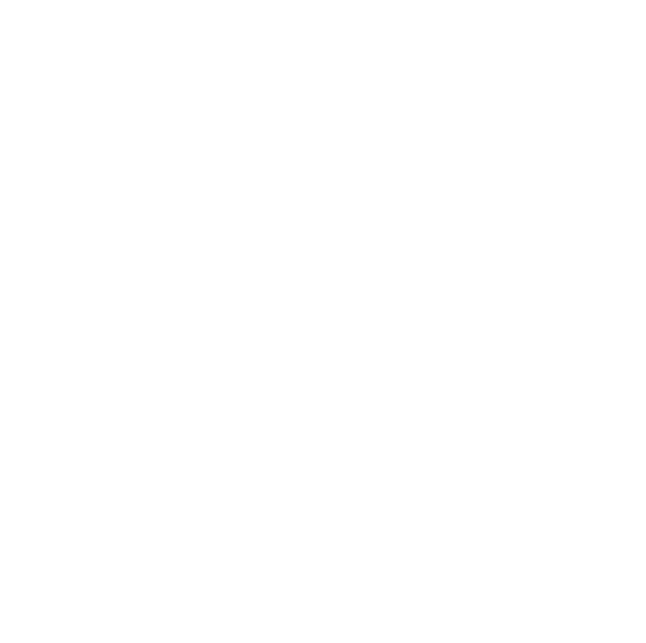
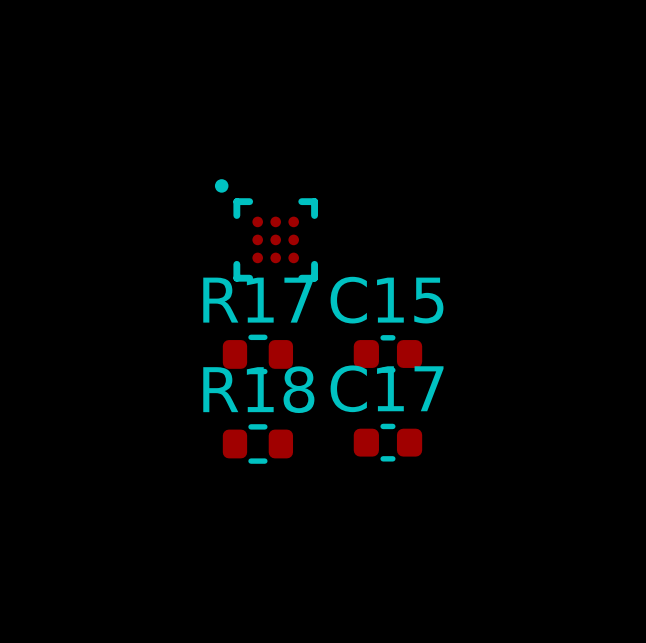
part: none -> (266, 230)
C15: none -> (387, 353)
R17: none -> (257, 354)
C17: none -> (387, 442)
R18: none -> (257, 443)

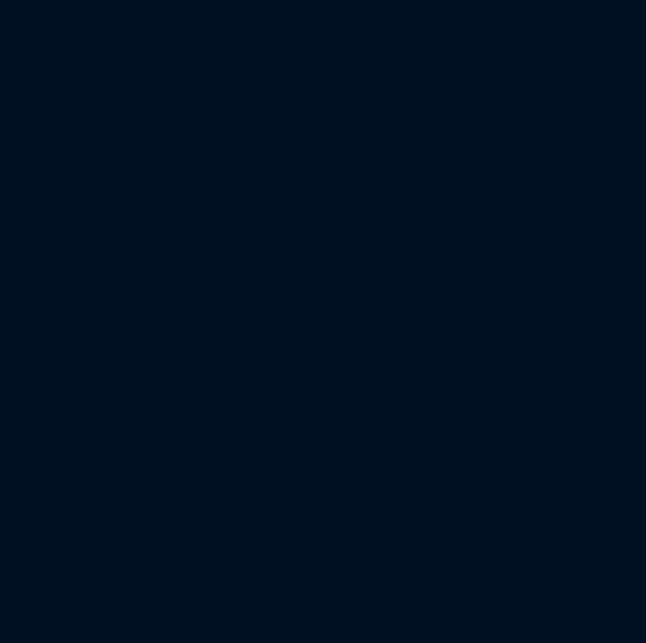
part: (266, 230) -> none
C15: (387, 353) -> none
R17: (257, 354) -> none
C17: (387, 442) -> none
R18: (257, 443) -> none

